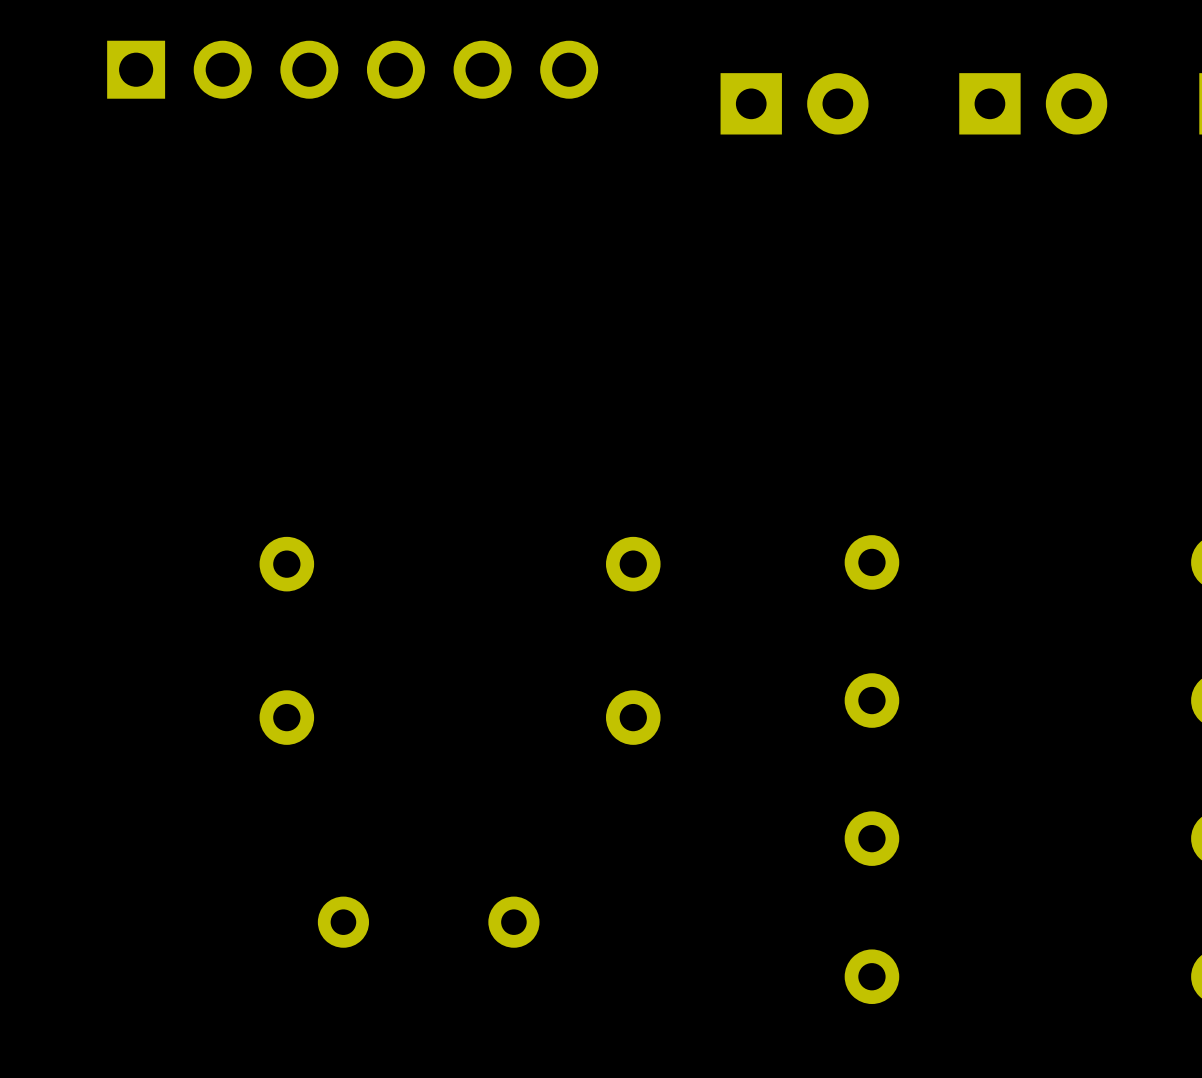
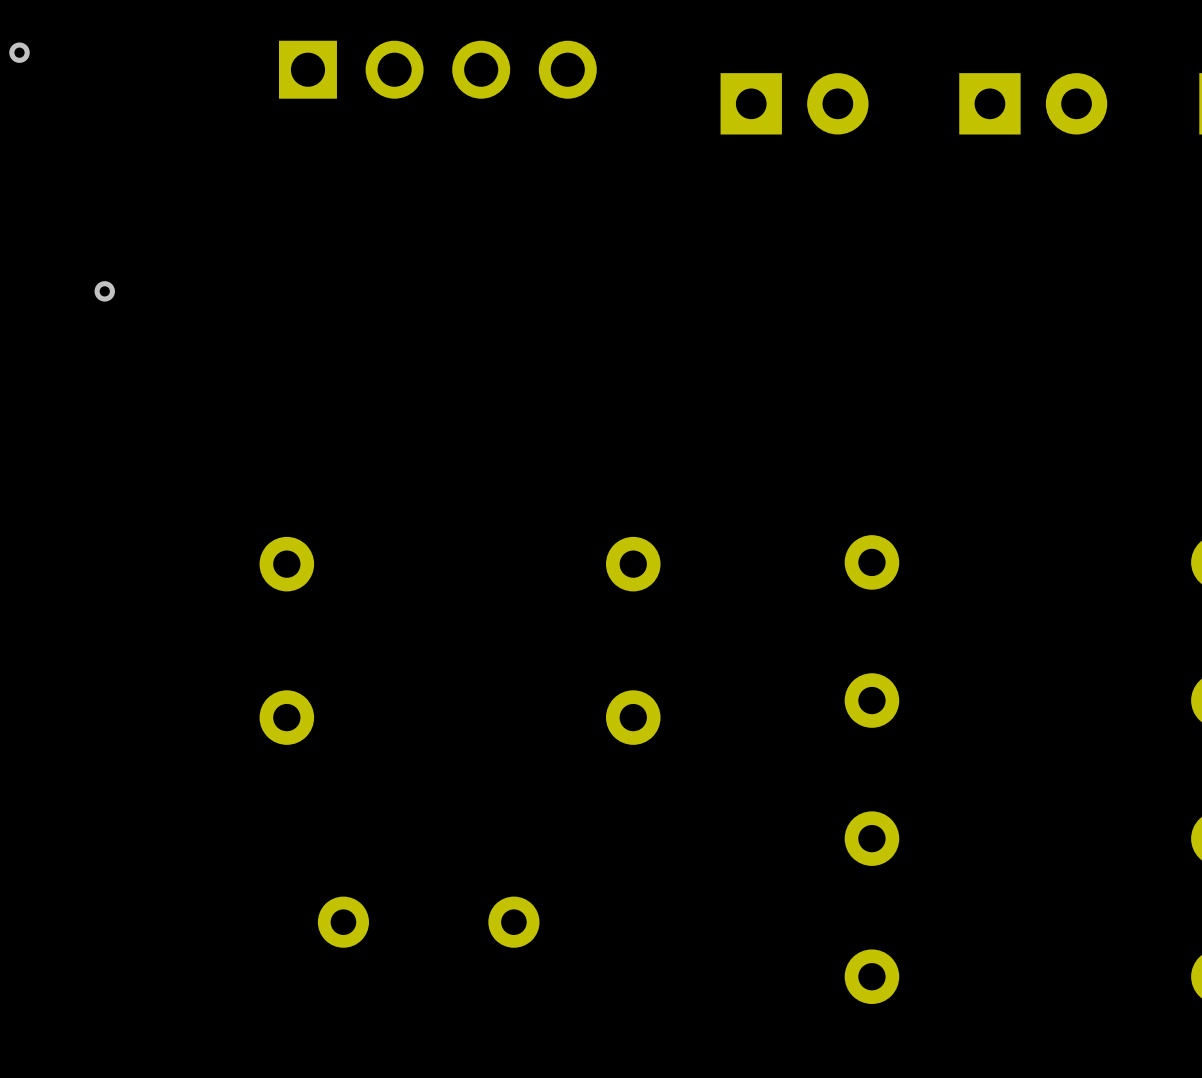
via: none -> (19, 52)
part: (352, 69) -> none
part: none -> (437, 69)
via: none -> (104, 291)

